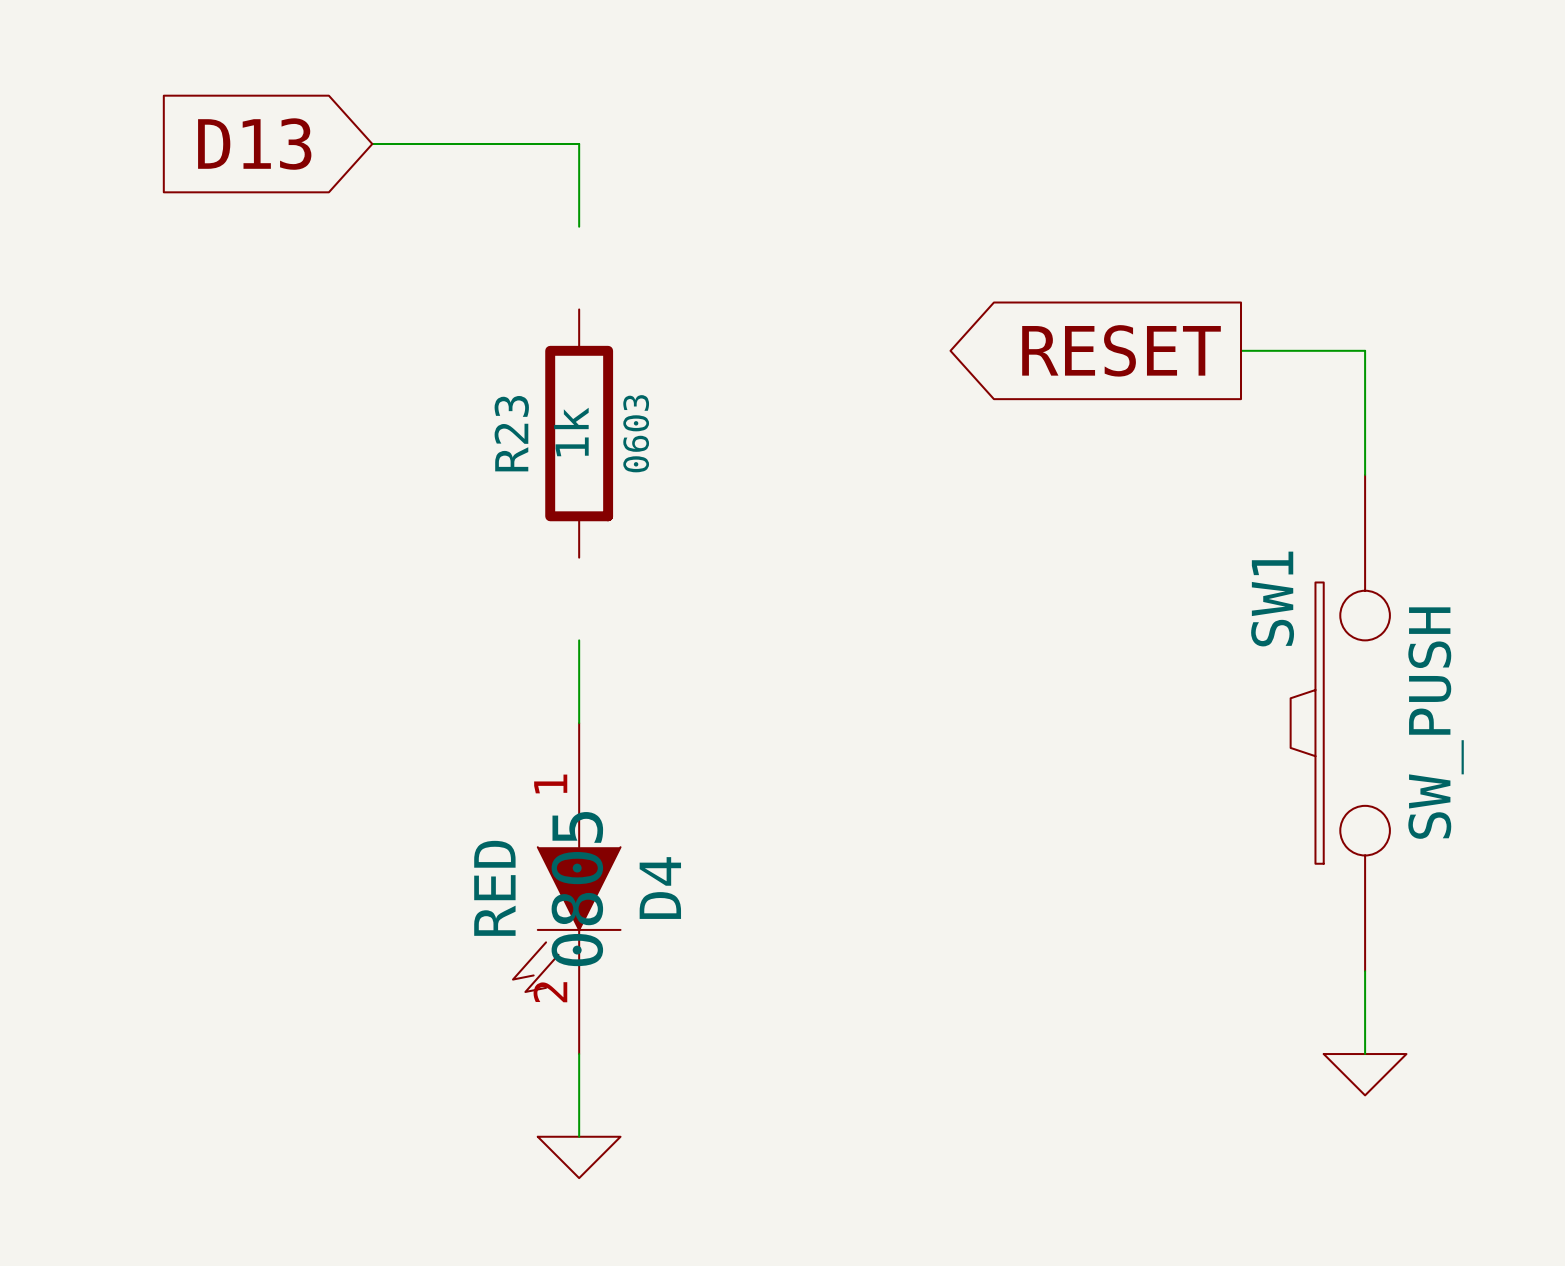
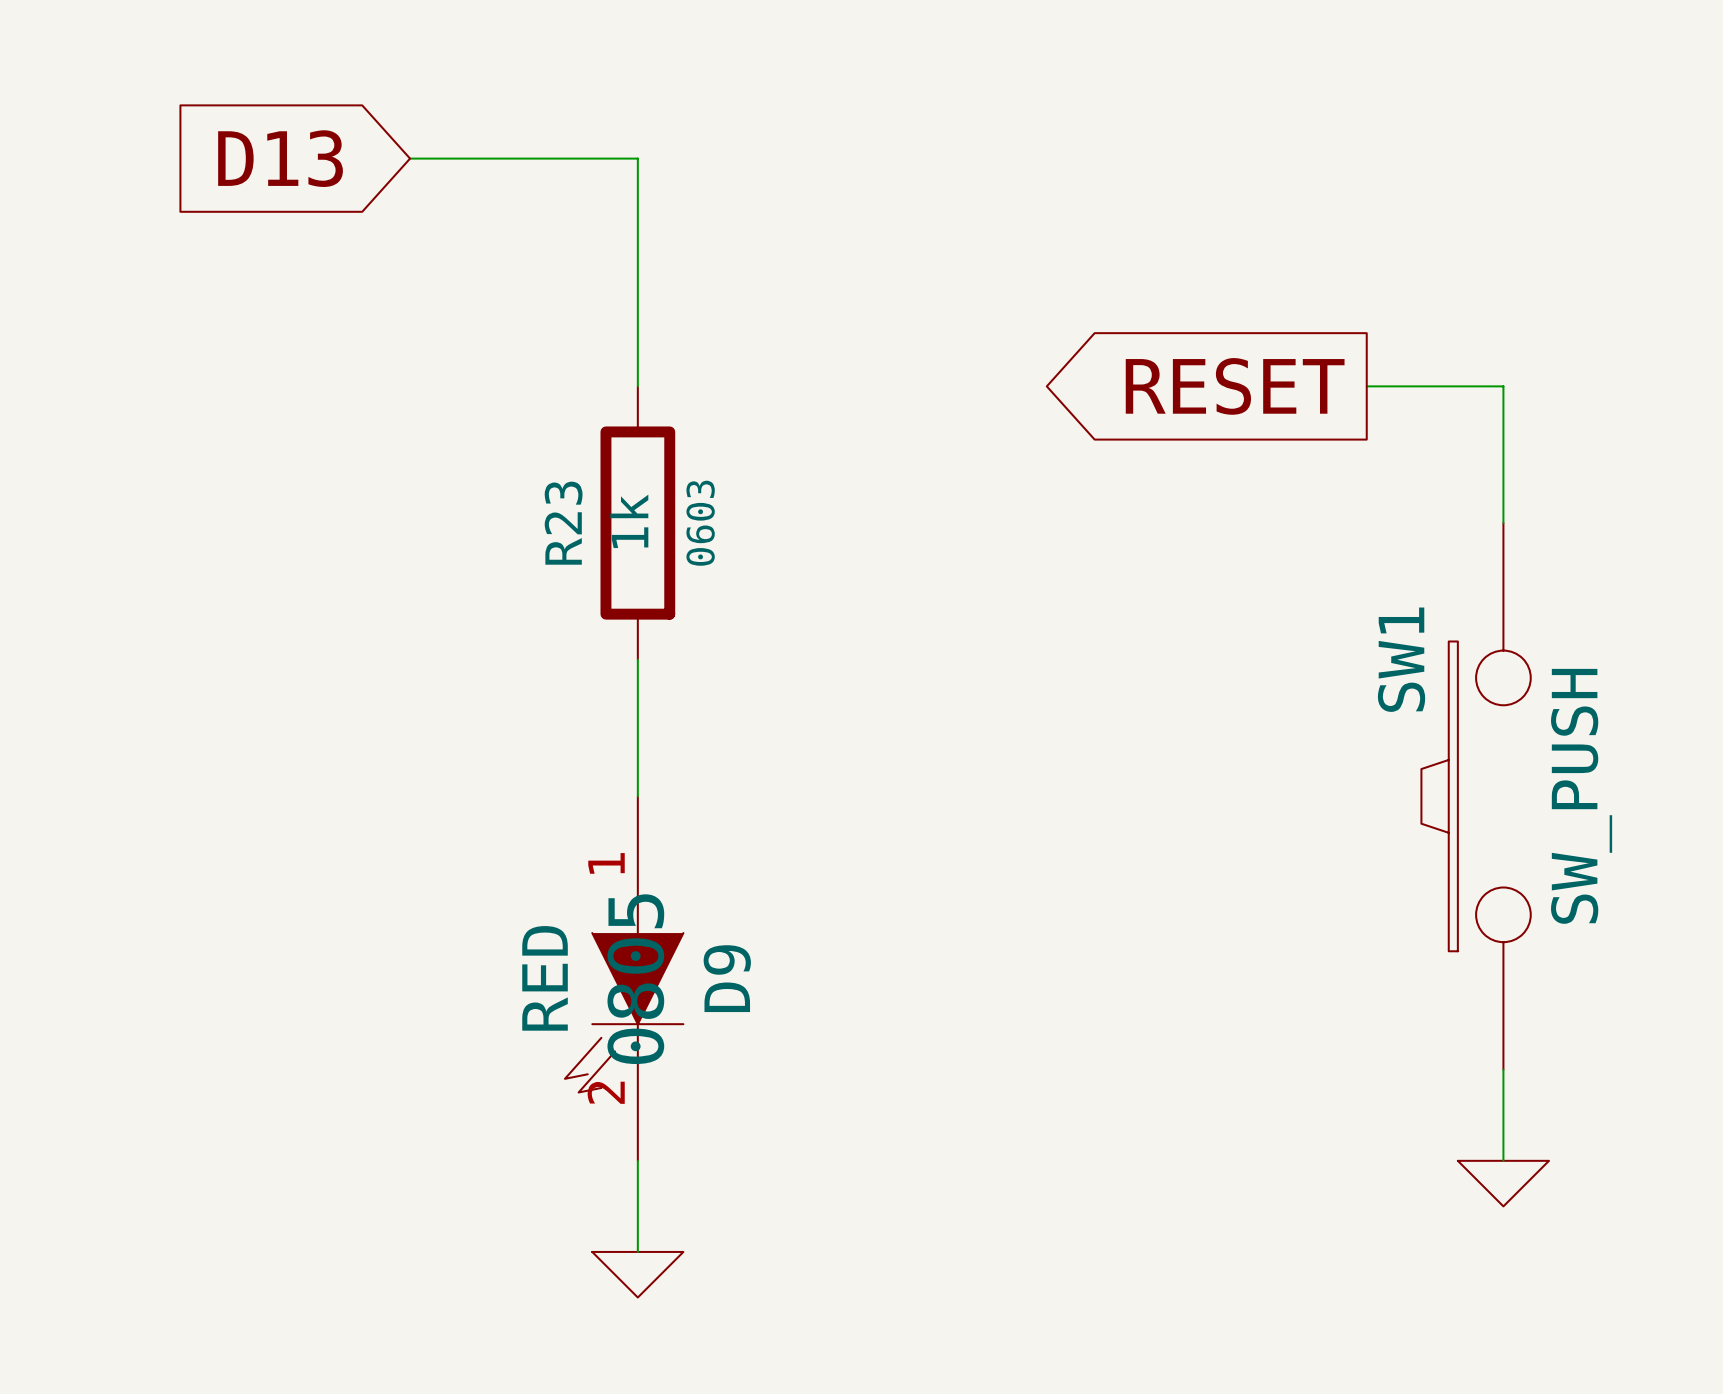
wire: none -> (637, 249) (637, 386)
R23 position: (579, 433) -> (637, 523)
wire: none -> (637, 659) (637, 705)
D4 name: D4 (660, 888) -> D9 (727, 978)

